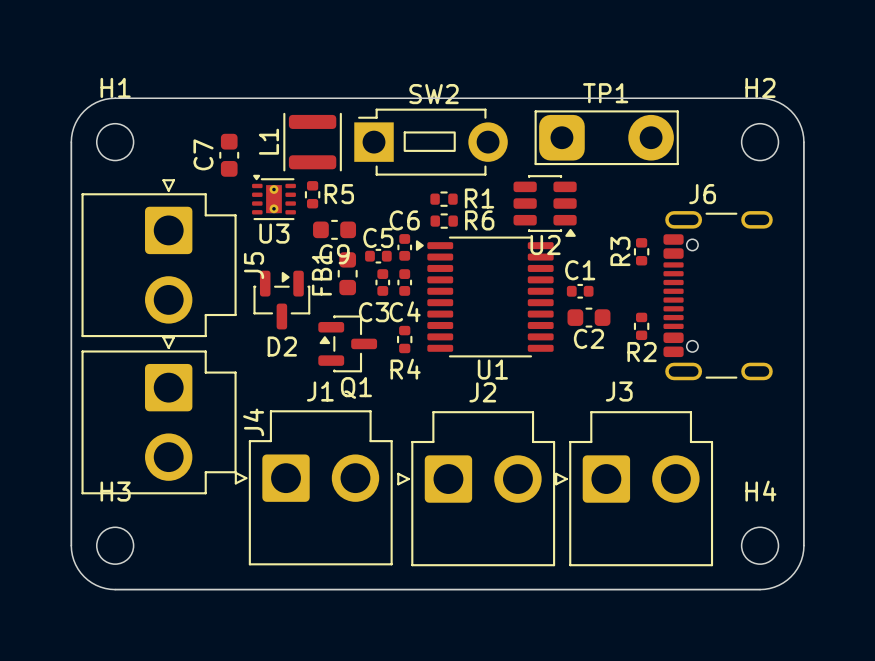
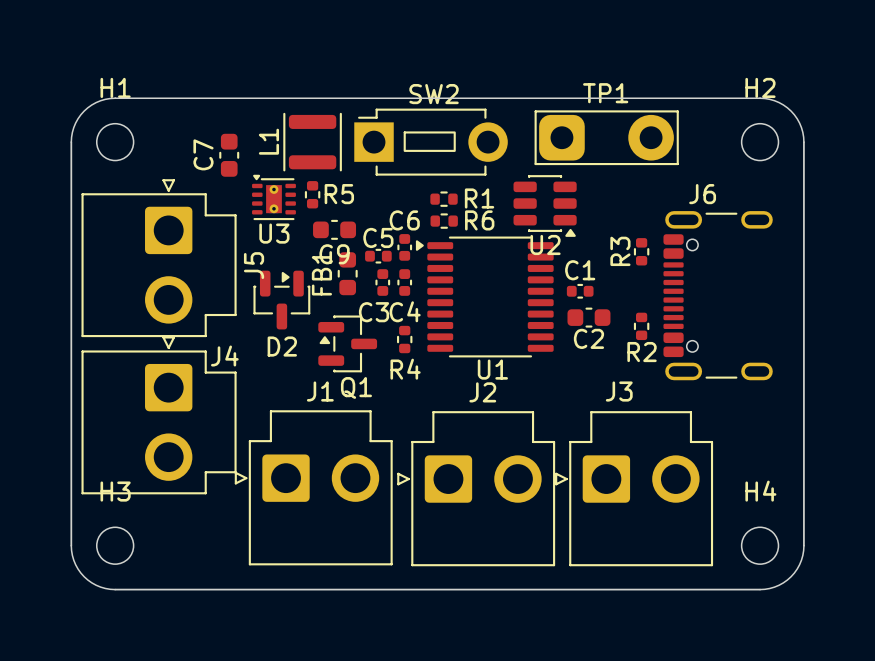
J4 name rotation: 0° (253, 422) -> 90° clockwise (224, 356)
J4 name position: J4 (253, 422) -> J4 (224, 356)

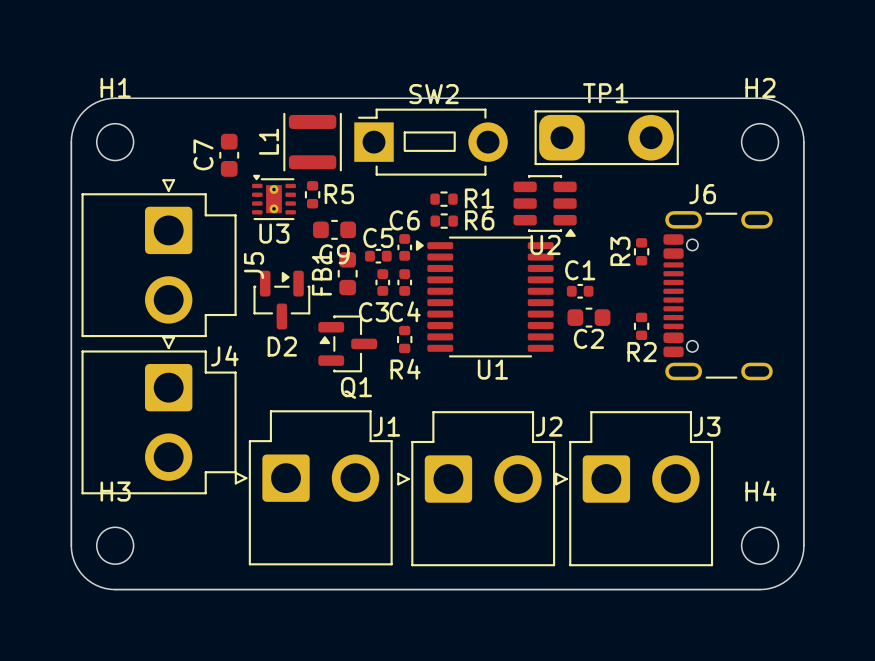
J1 name position: J1 (320, 391) -> J1 (386, 426)
J3 name position: J3 (619, 391) -> J3 (707, 426)
J2 name position: J2 (482, 392) -> J2 (549, 426)

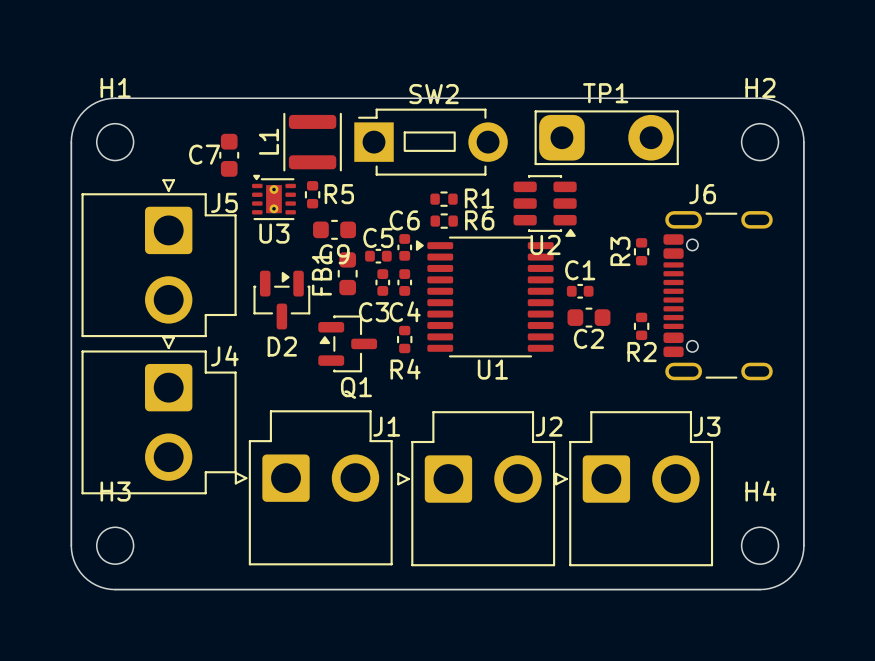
C7 name rotation: 0° (203, 154) -> 90° clockwise (204, 154)
J5 name rotation: 0° (254, 265) -> 90° clockwise (224, 202)
J5 name position: J5 (254, 265) -> J5 (224, 202)

